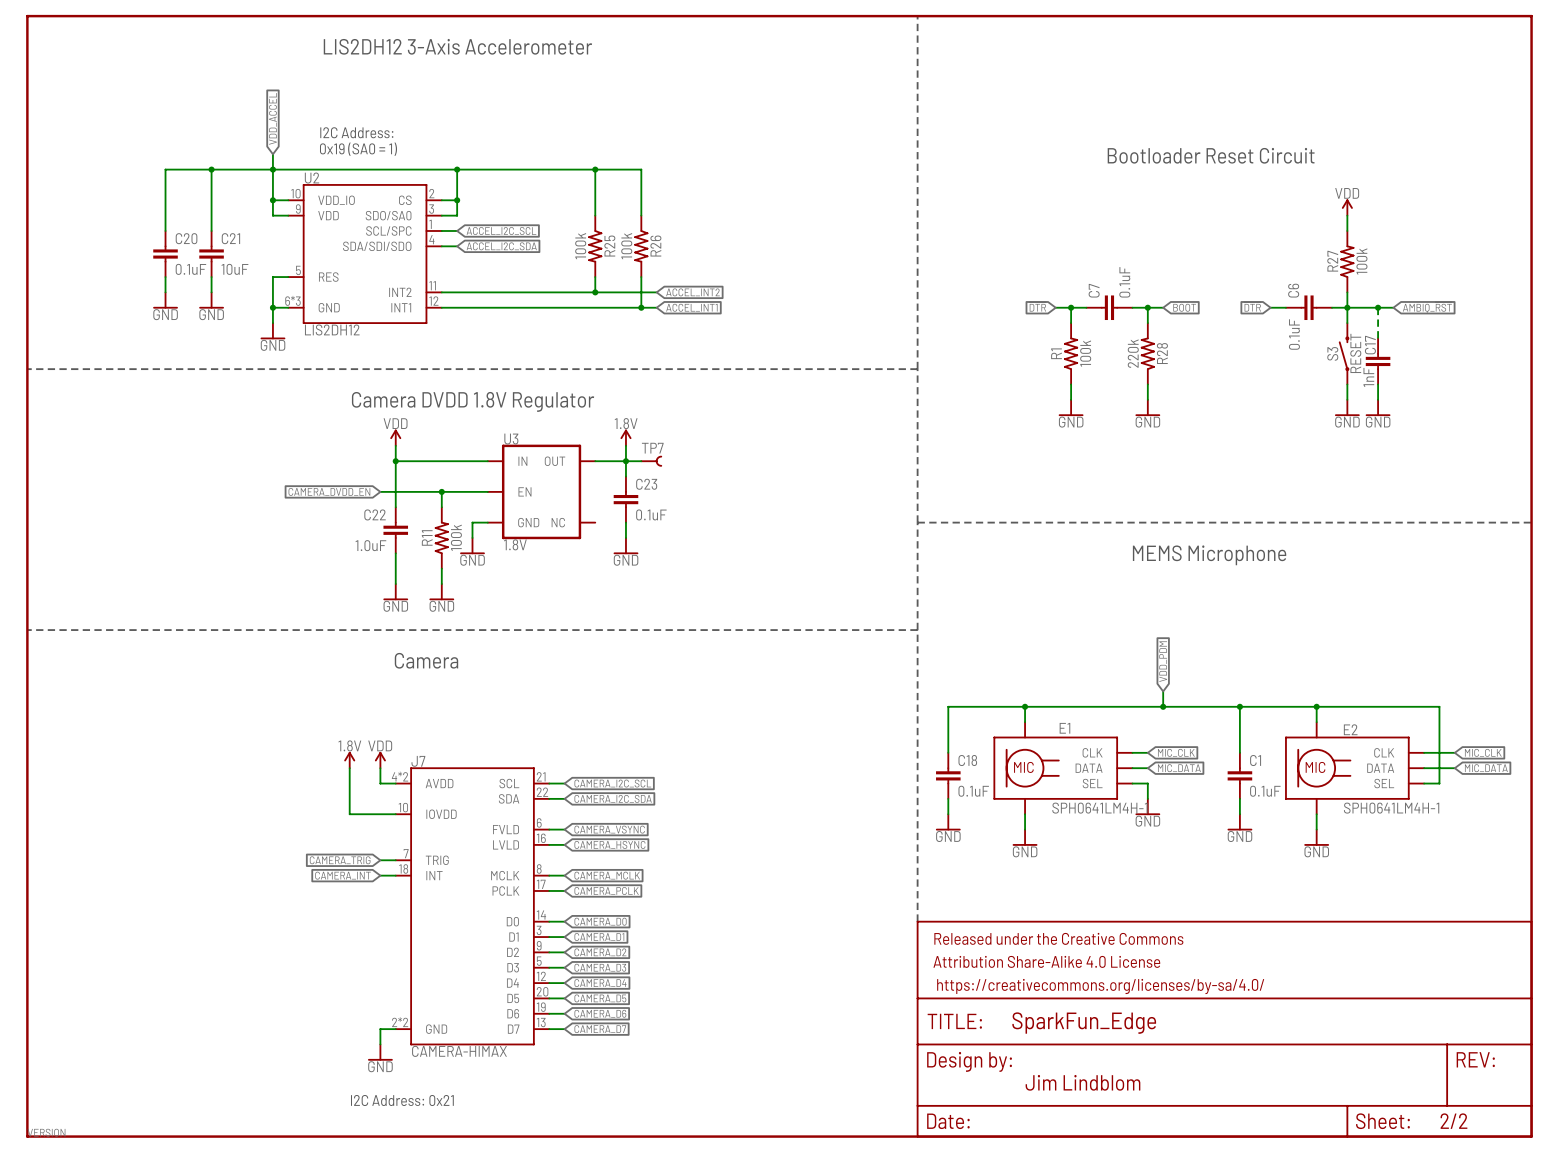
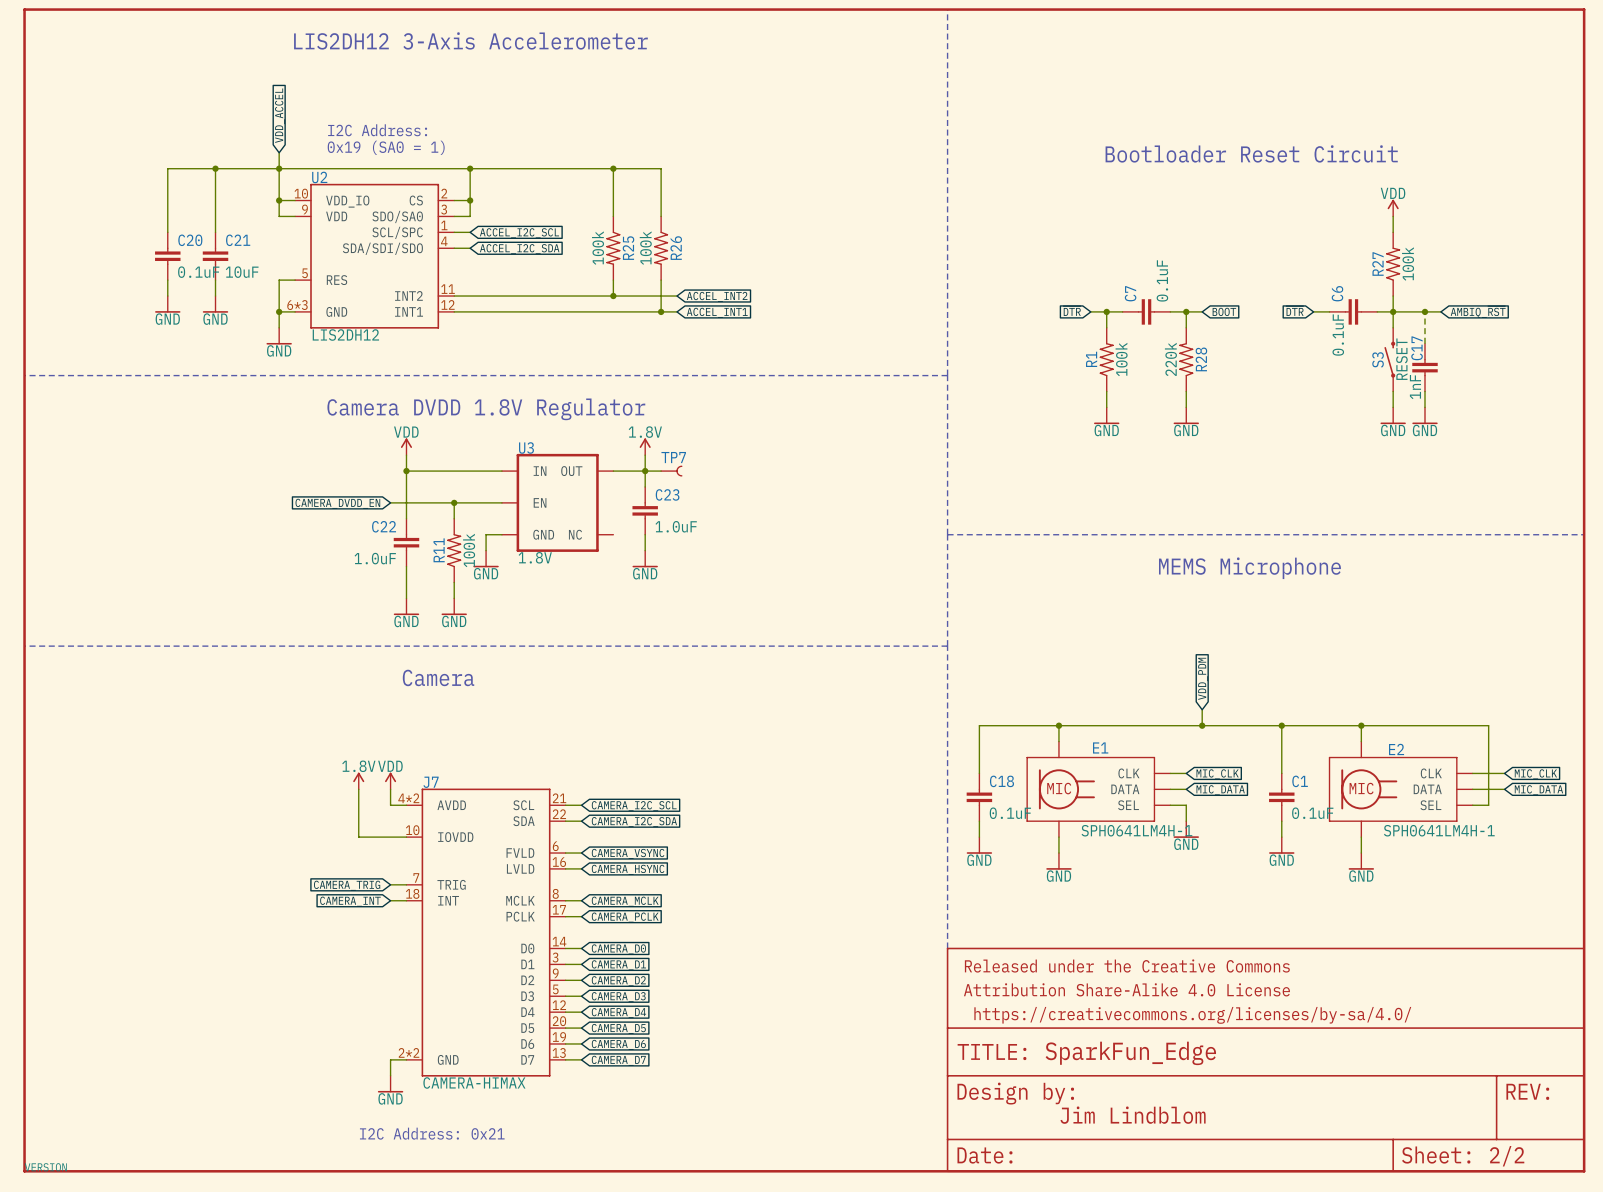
C23 value: 0.1uF (651, 514) -> 1.0uF (676, 526)

